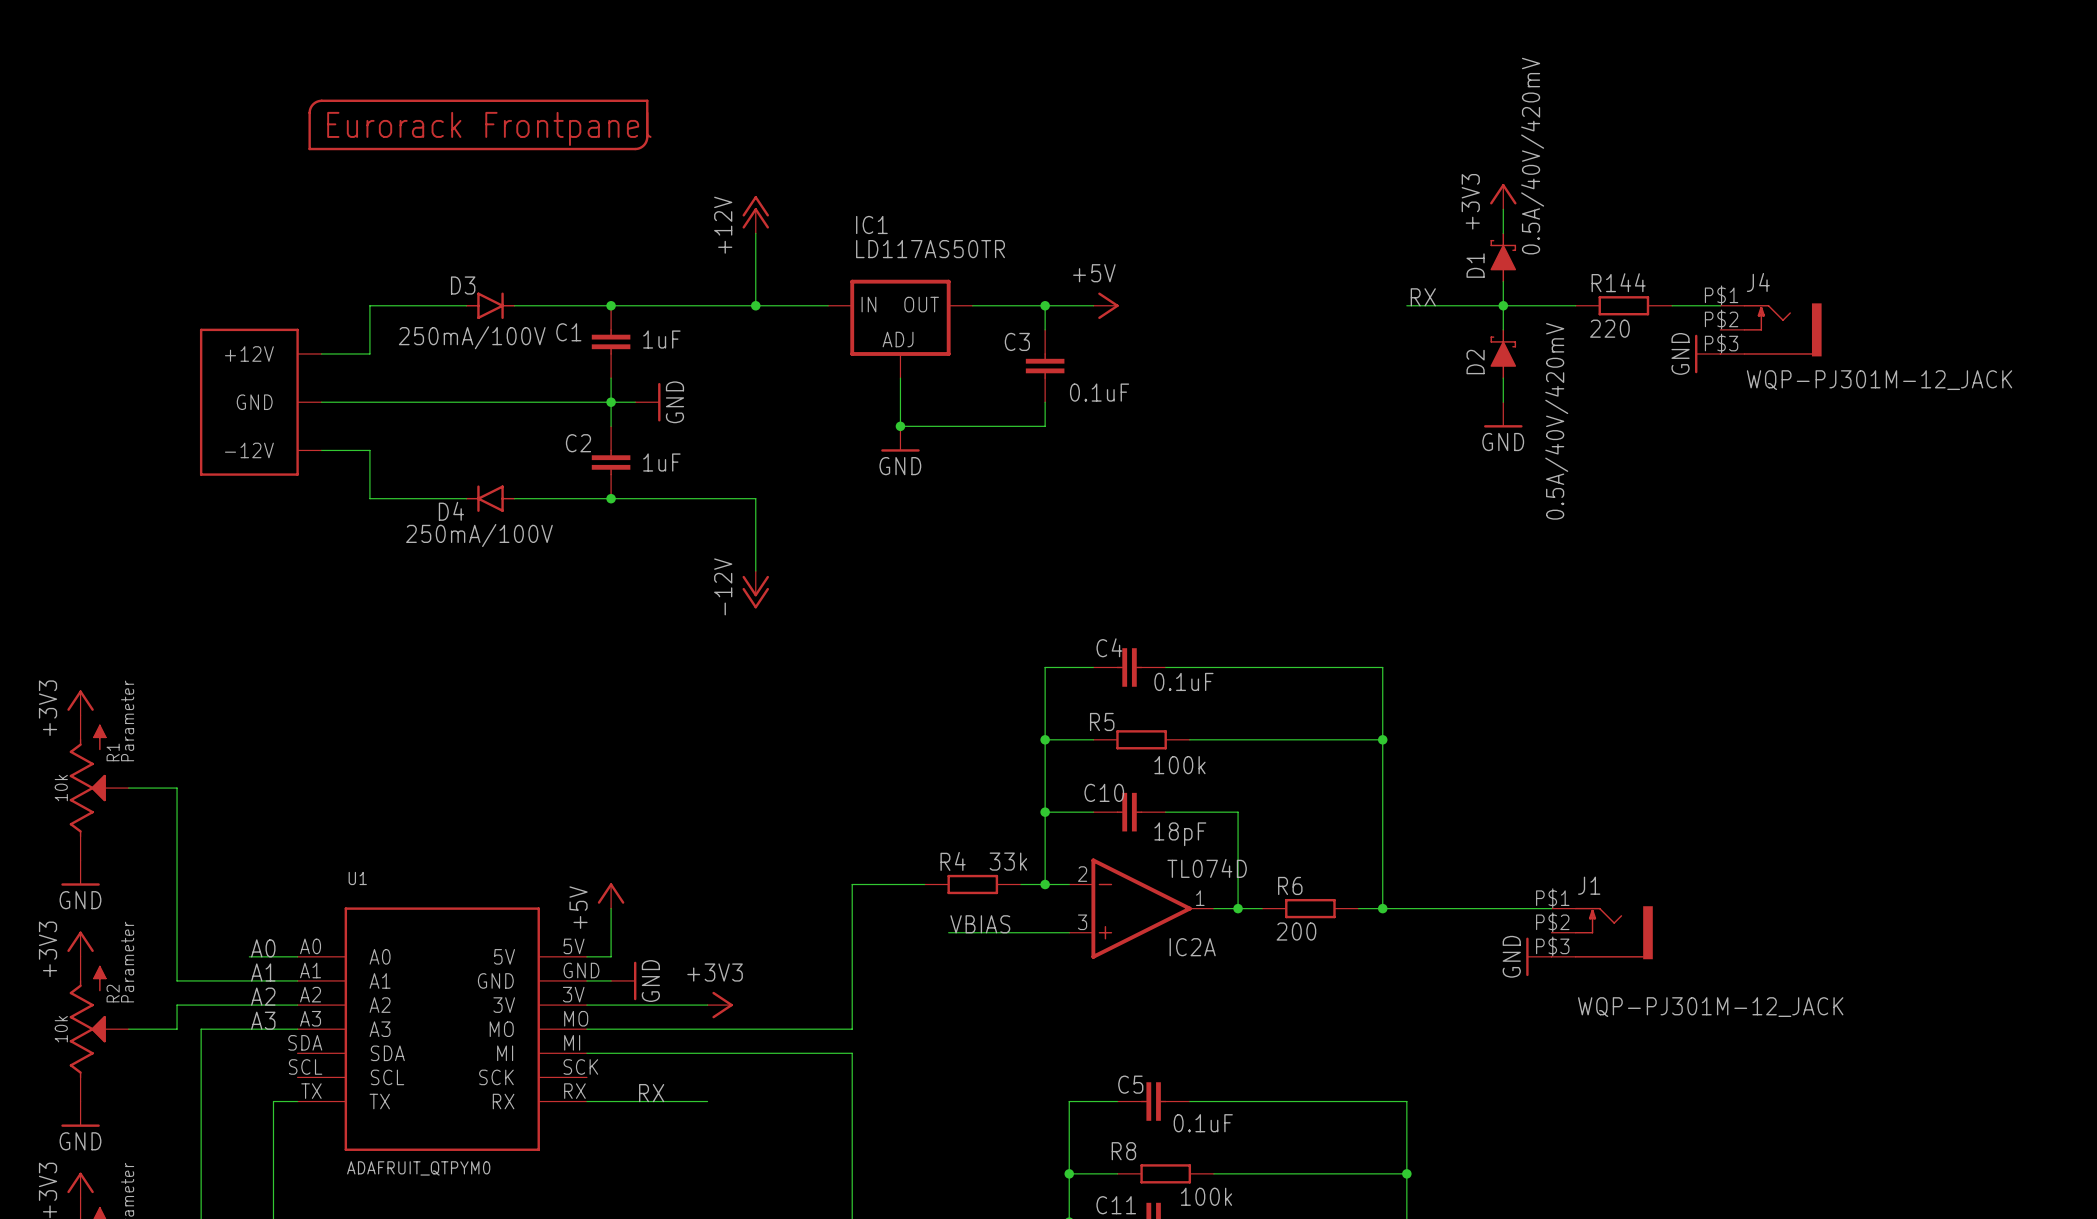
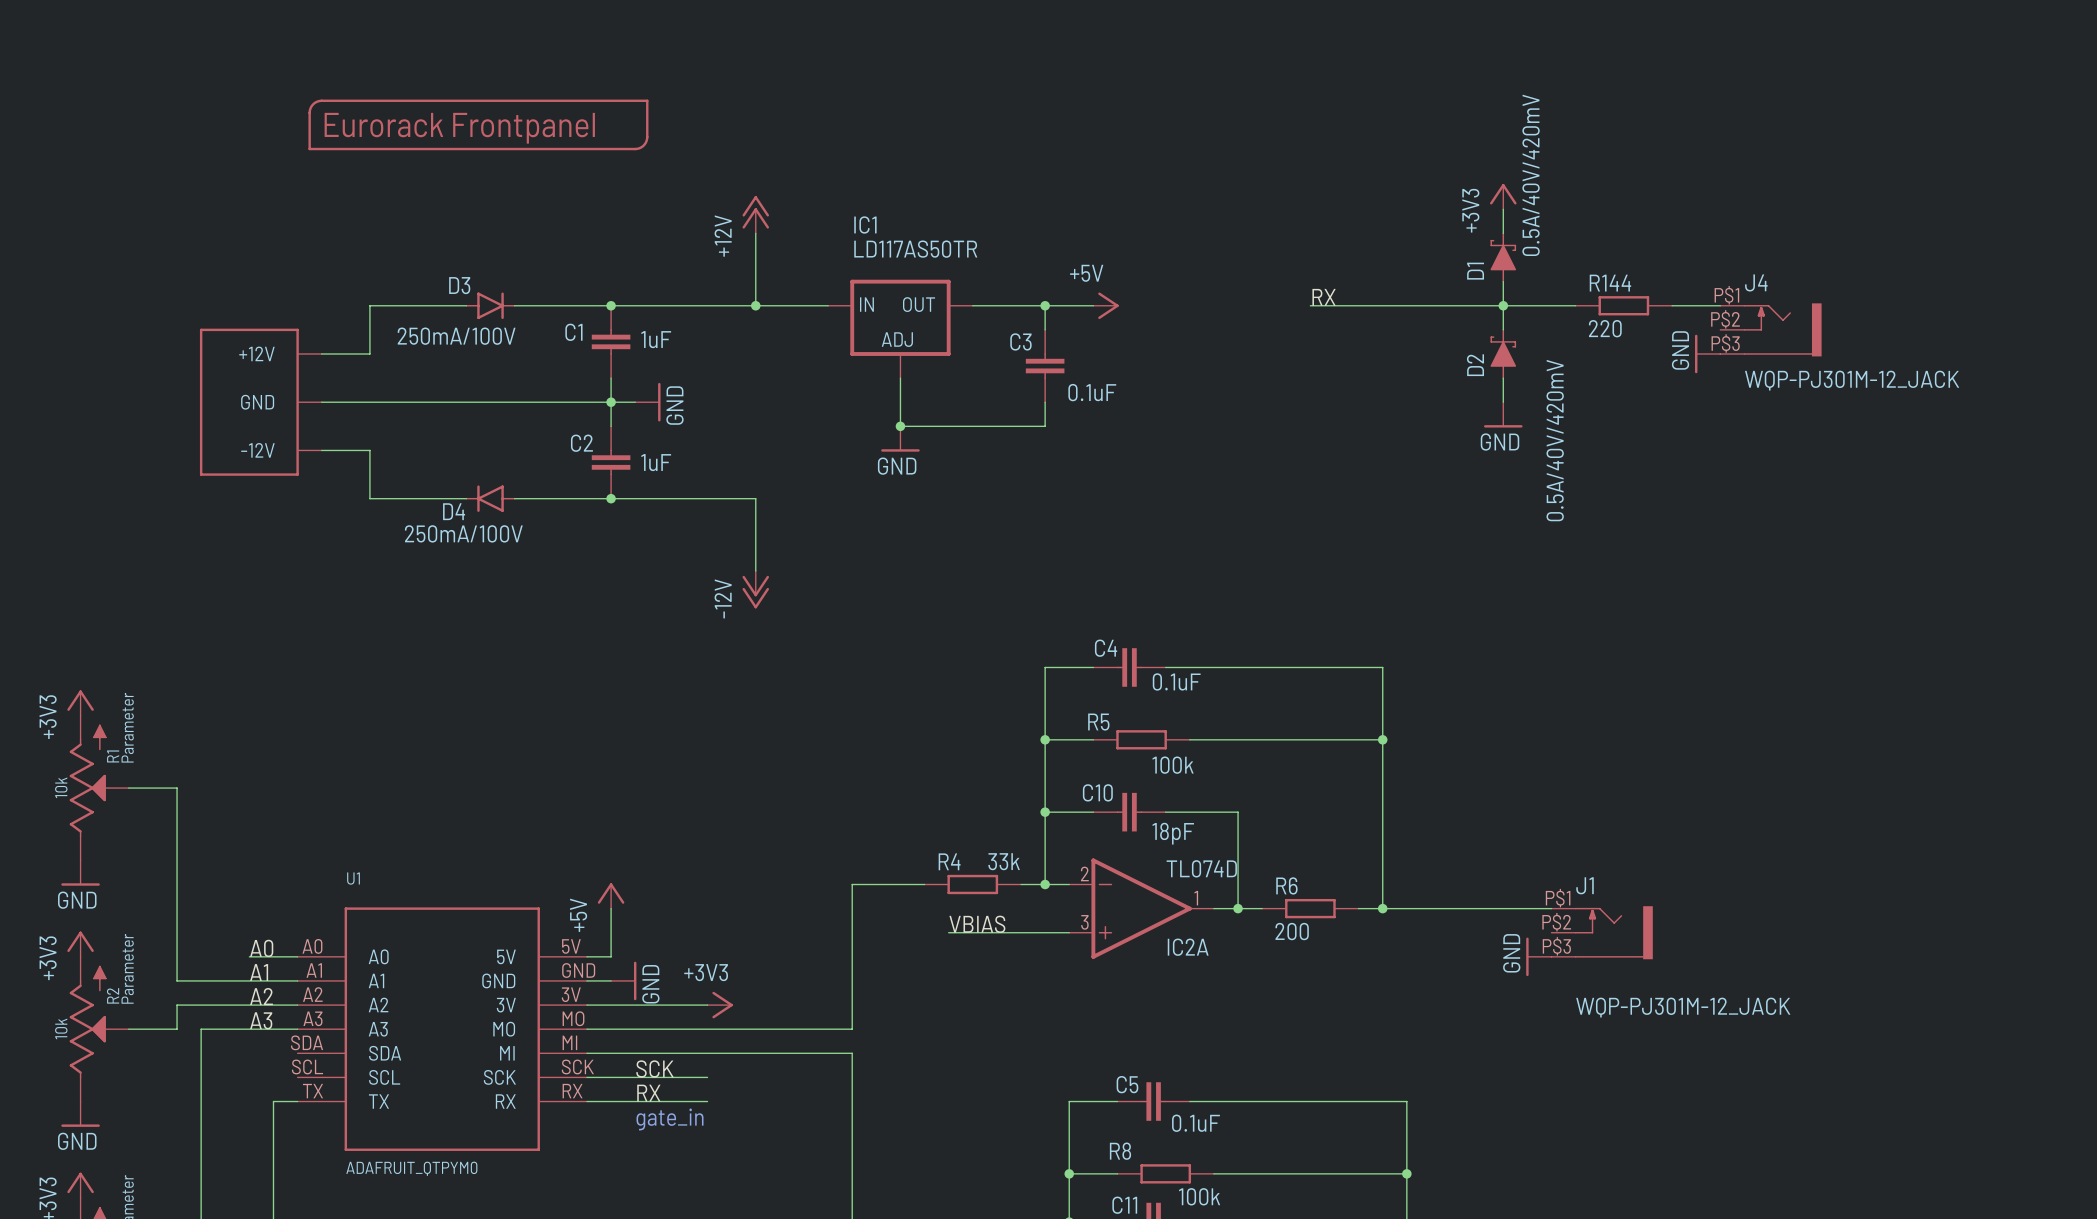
label position: RX (1423, 297) -> RX (1324, 297)
wire: none -> (1310, 305) (1406, 305)
label: none -> SCK (655, 1068)
wire: none -> (586, 1077) (707, 1077)
text: none -> gate_in (670, 1119)

